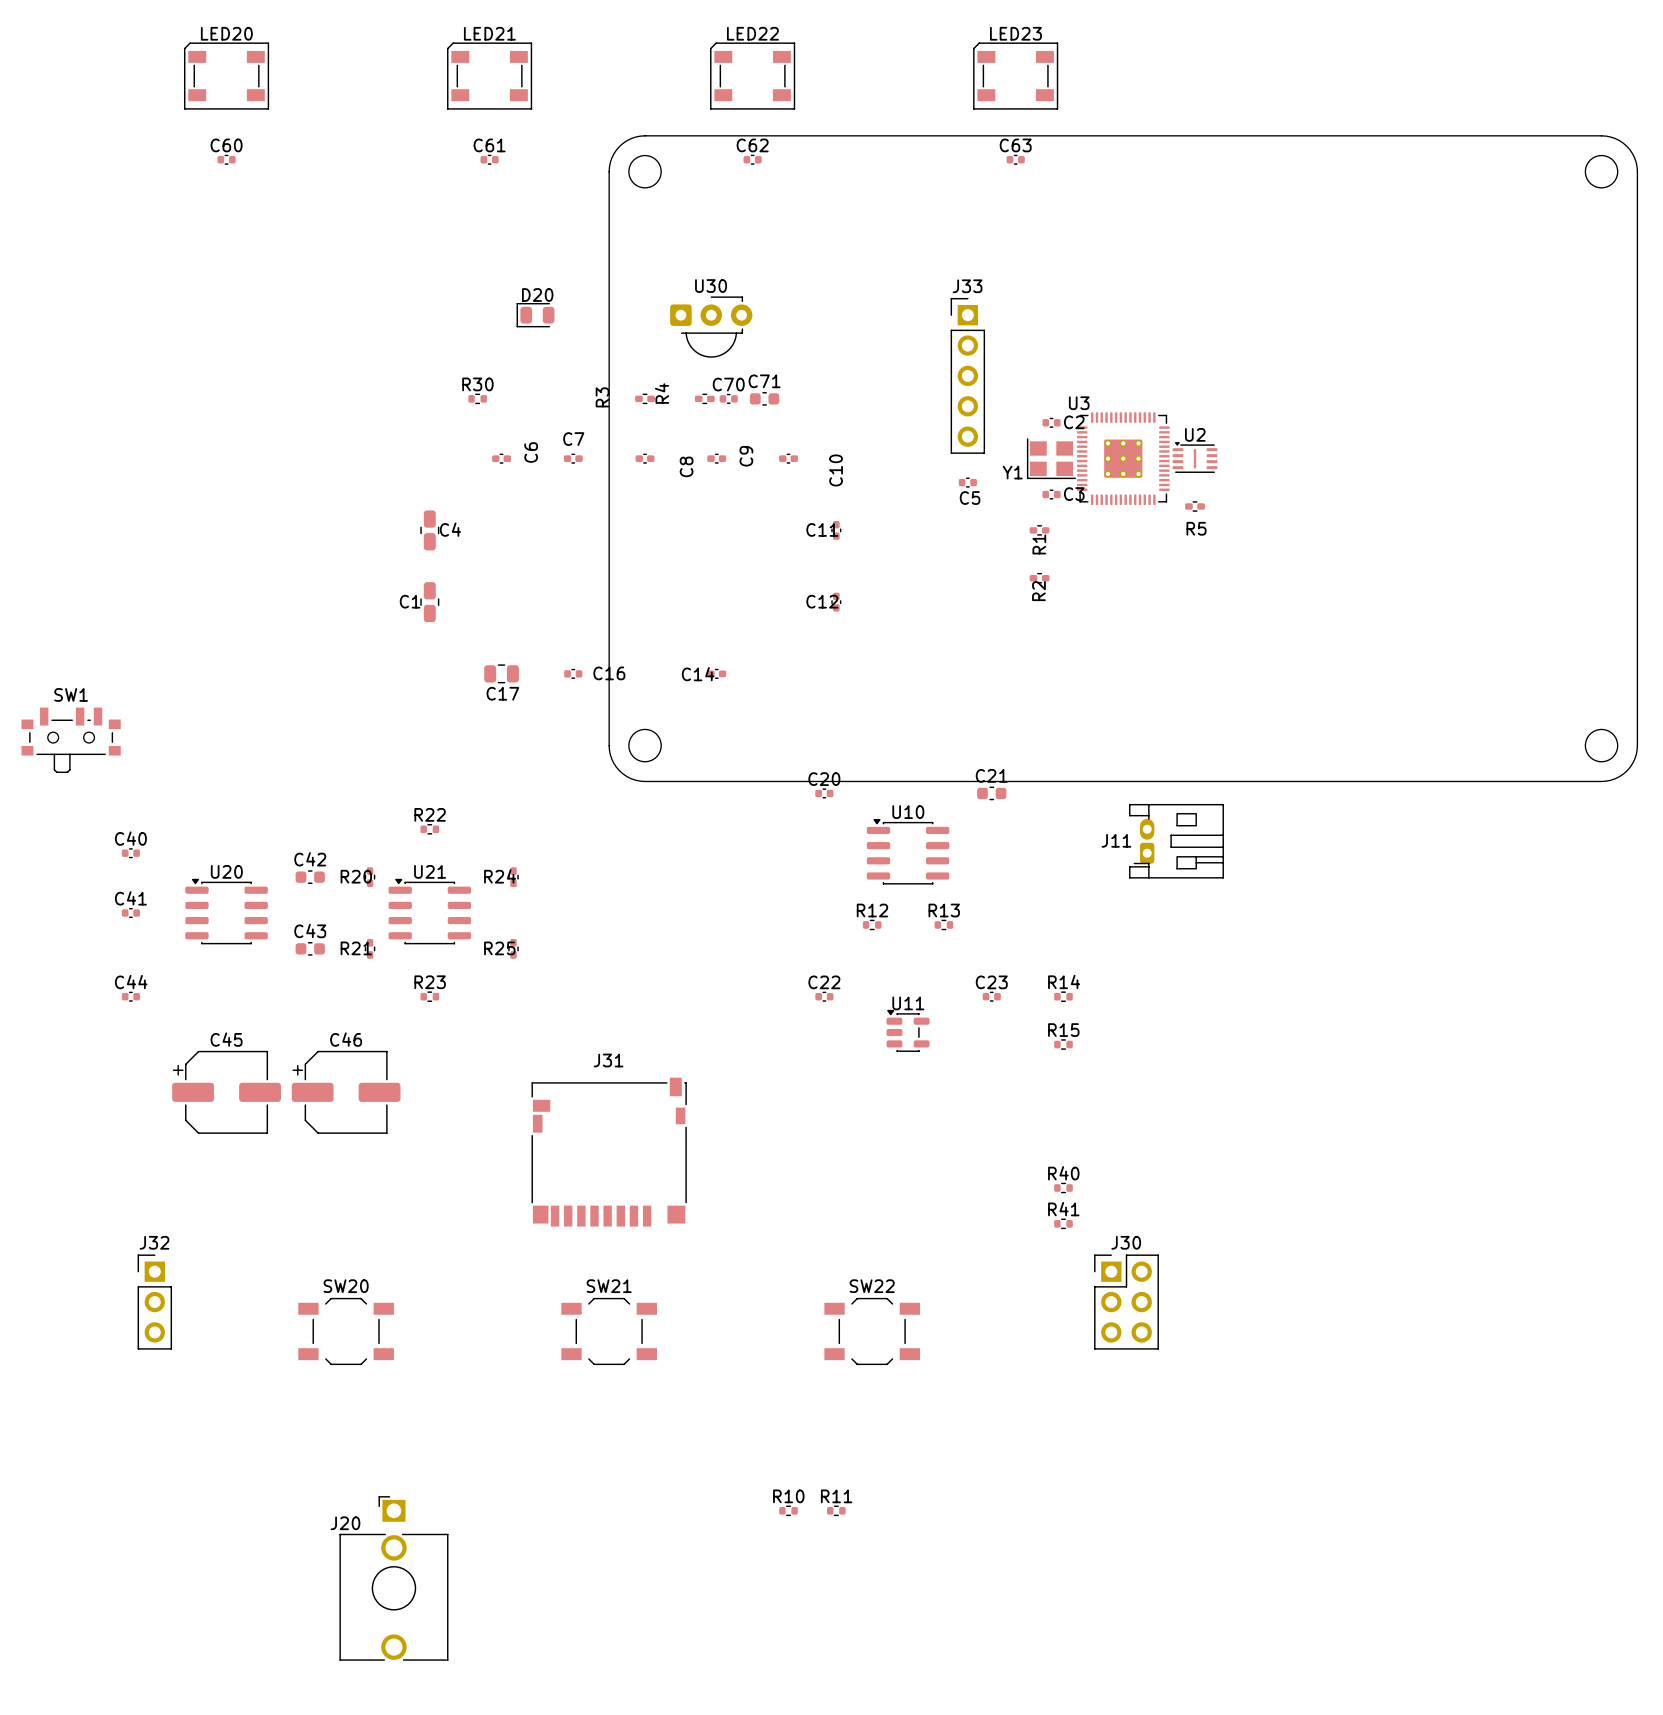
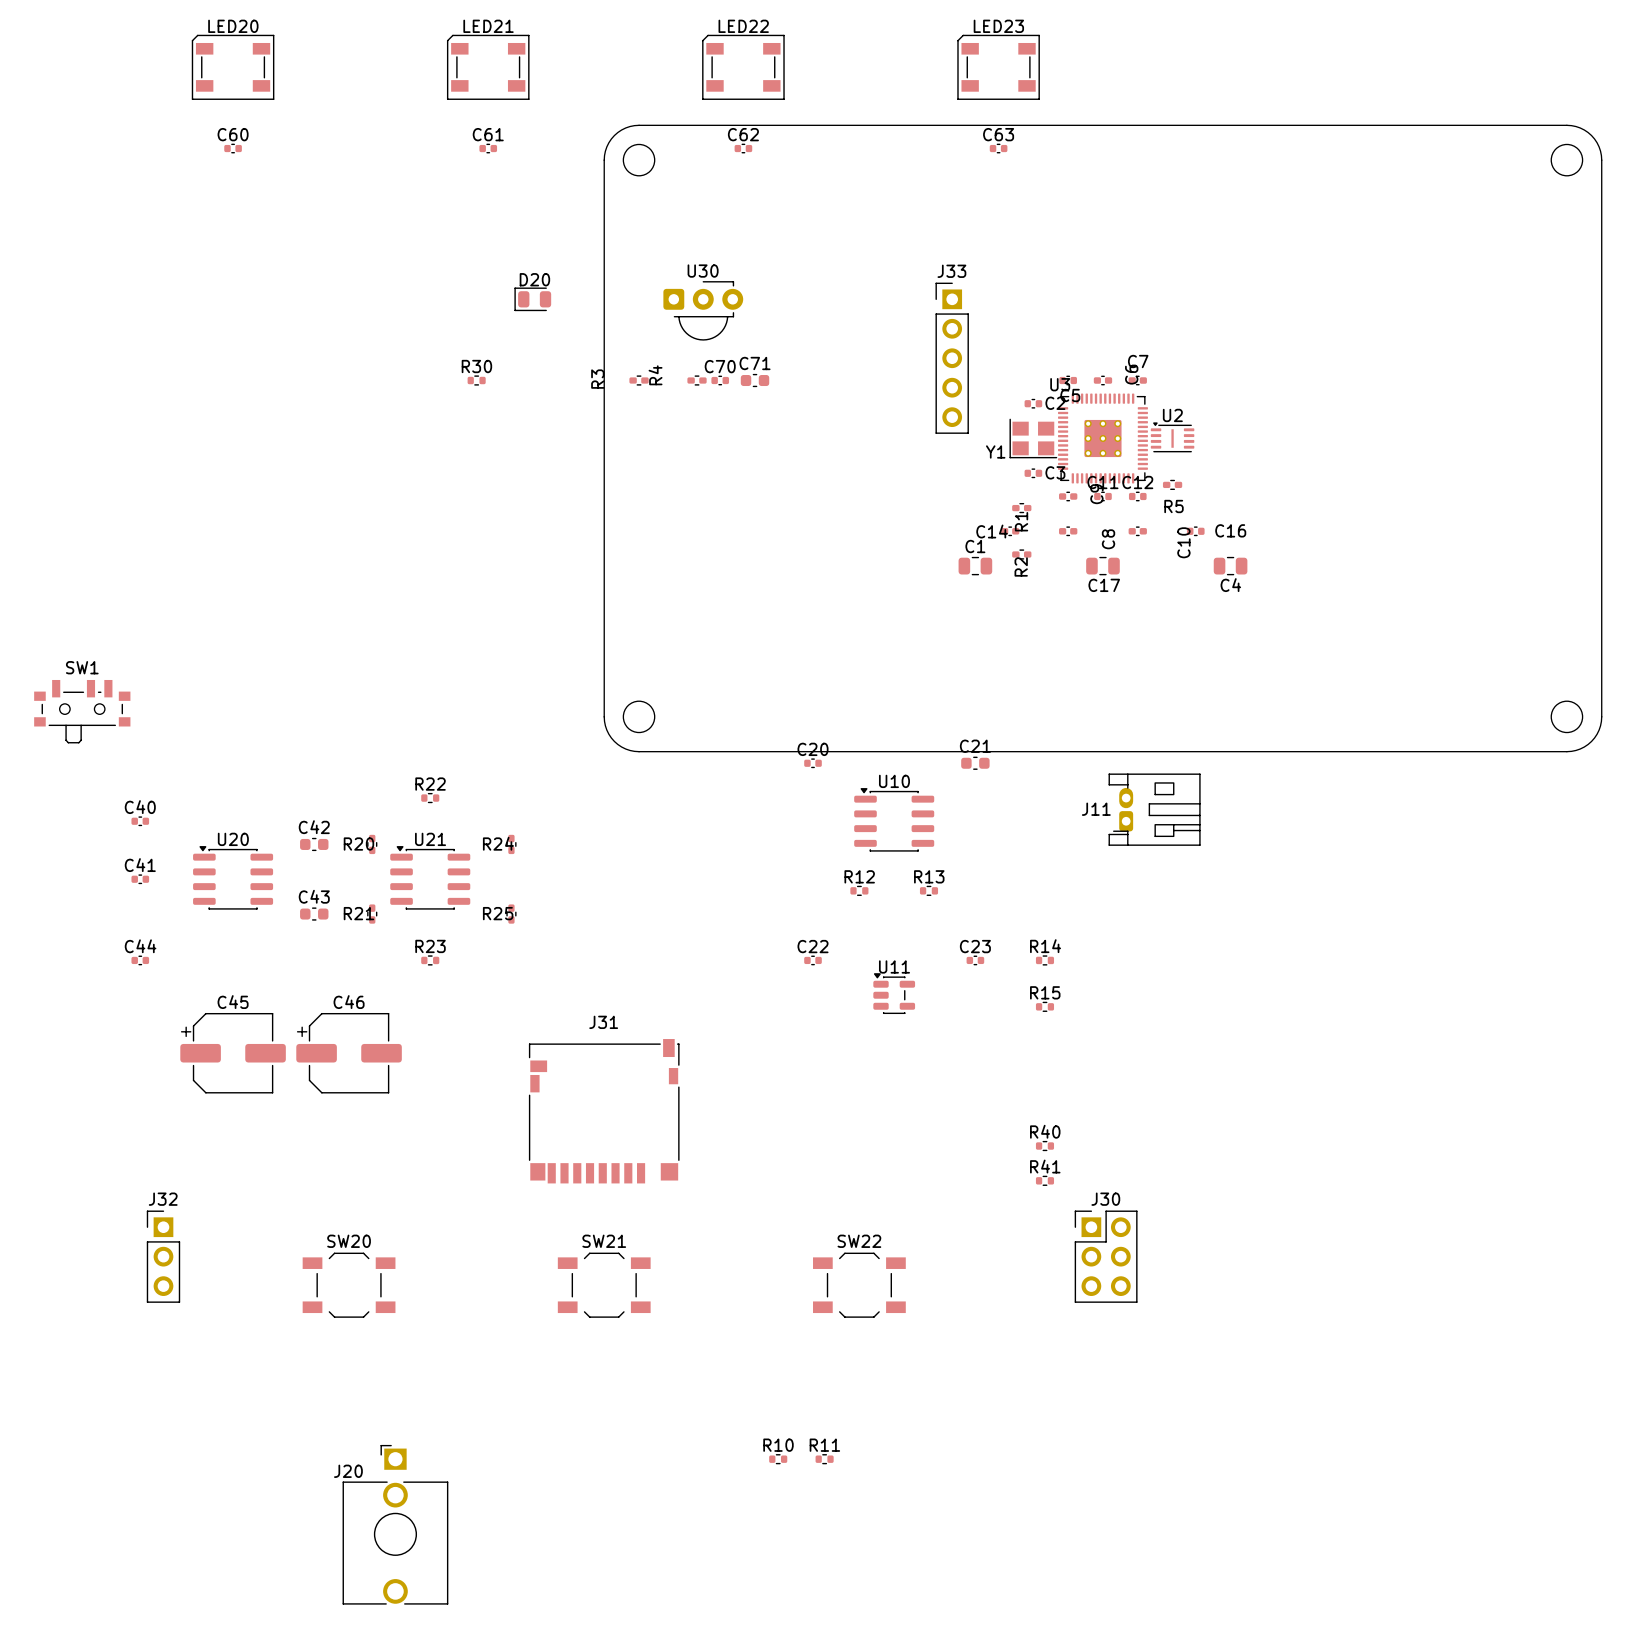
C6 position: (501, 458) -> (1102, 380)
C7 position: (573, 458) -> (1137, 380)
C8 position: (645, 458) -> (1068, 531)
C9 position: (716, 458) -> (1068, 496)
C10 position: (788, 458) -> (1137, 531)
C5 position: (967, 482) -> (1068, 380)
C4 footprint: [420, 510, 440, 551] -> [1213, 556, 1248, 576]
C11 footprint: [831, 520, 842, 540] -> [1094, 491, 1112, 502]
C4 name position: C4 (450, 529) -> C4 (1230, 585)
C1 footprint: [420, 582, 440, 623] -> [958, 556, 993, 576]
C12 footprint: [831, 592, 842, 612] -> [1128, 491, 1147, 502]
C1 name position: C1 (410, 601) -> C1 (975, 546)
C17 position: (501, 673) -> (1102, 566)
C16 position: (573, 673) -> (1195, 531)
C14 position: (716, 673) -> (1010, 531)

